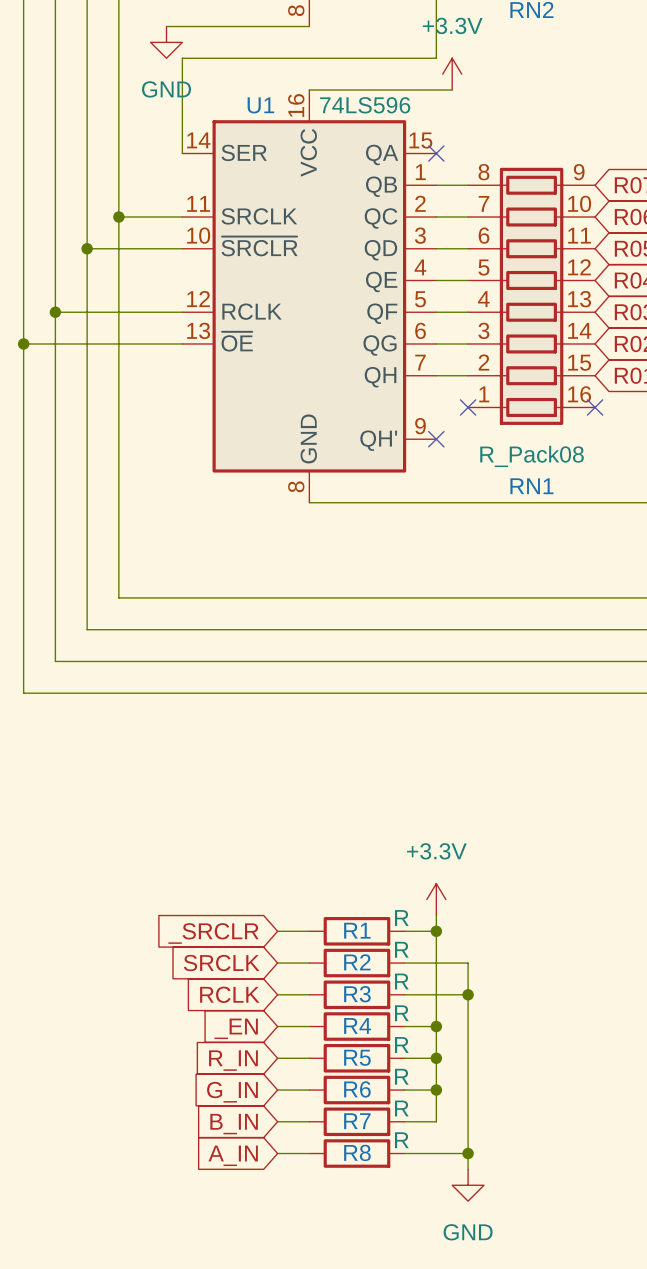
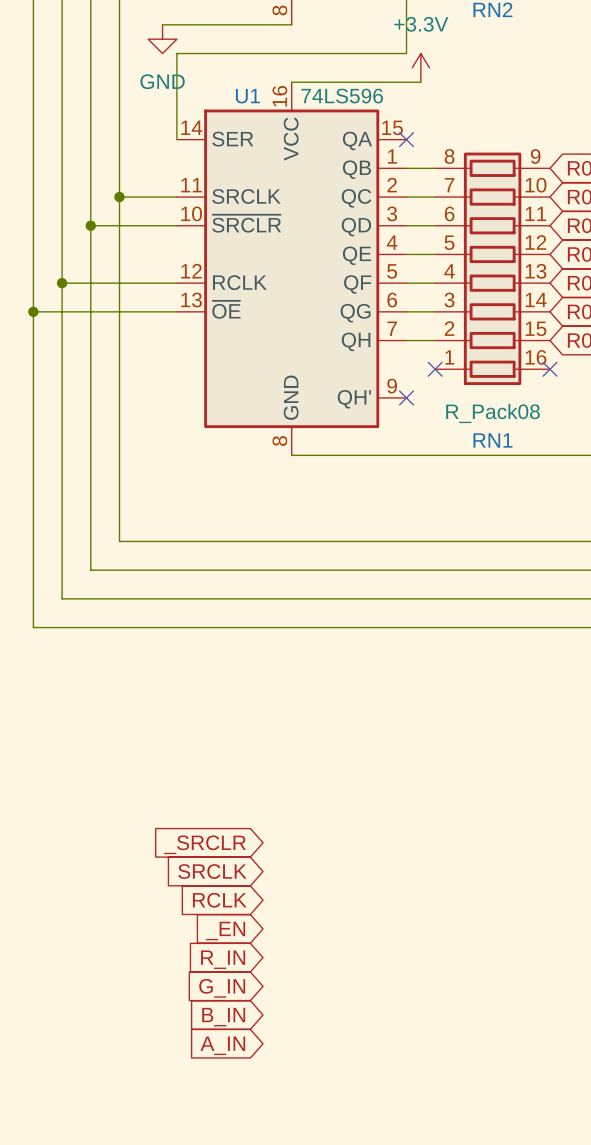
power symbol: +3.3V (436, 899) -> none
wire: (436, 915) (436, 1121) (404, 1121) -> none
wire: (277, 931) (309, 931) -> none
R1: R (356, 931) -> none
wire: (404, 931) (436, 931) -> none
junction: (436, 931) -> none
wire: (277, 963) (309, 963) -> none
R2: R (356, 963) -> none
wire: (404, 963) (468, 963) (468, 1169) -> none
wire: (277, 994) (309, 994) -> none
R3: R (356, 994) -> none
wire: (404, 994) (468, 994) -> none
junction: (468, 994) -> none
wire: (277, 1026) (309, 1026) -> none
R4: R (356, 1026) -> none
wire: (404, 1026) (436, 1026) -> none
junction: (436, 1026) -> none
wire: (277, 1058) (309, 1058) -> none
R5: R (356, 1058) -> none
wire: (404, 1058) (436, 1058) -> none
junction: (436, 1058) -> none
wire: (277, 1090) (309, 1090) -> none
R6: R (356, 1090) -> none
wire: (404, 1090) (436, 1090) -> none
junction: (436, 1090) -> none
wire: (277, 1121) (309, 1121) -> none
R7: R (356, 1121) -> none
wire: (277, 1153) (309, 1153) -> none
R8: R (356, 1153) -> none
wire: (404, 1153) (468, 1153) -> none
junction: (468, 1153) -> none
power symbol: GND (468, 1185) -> none

